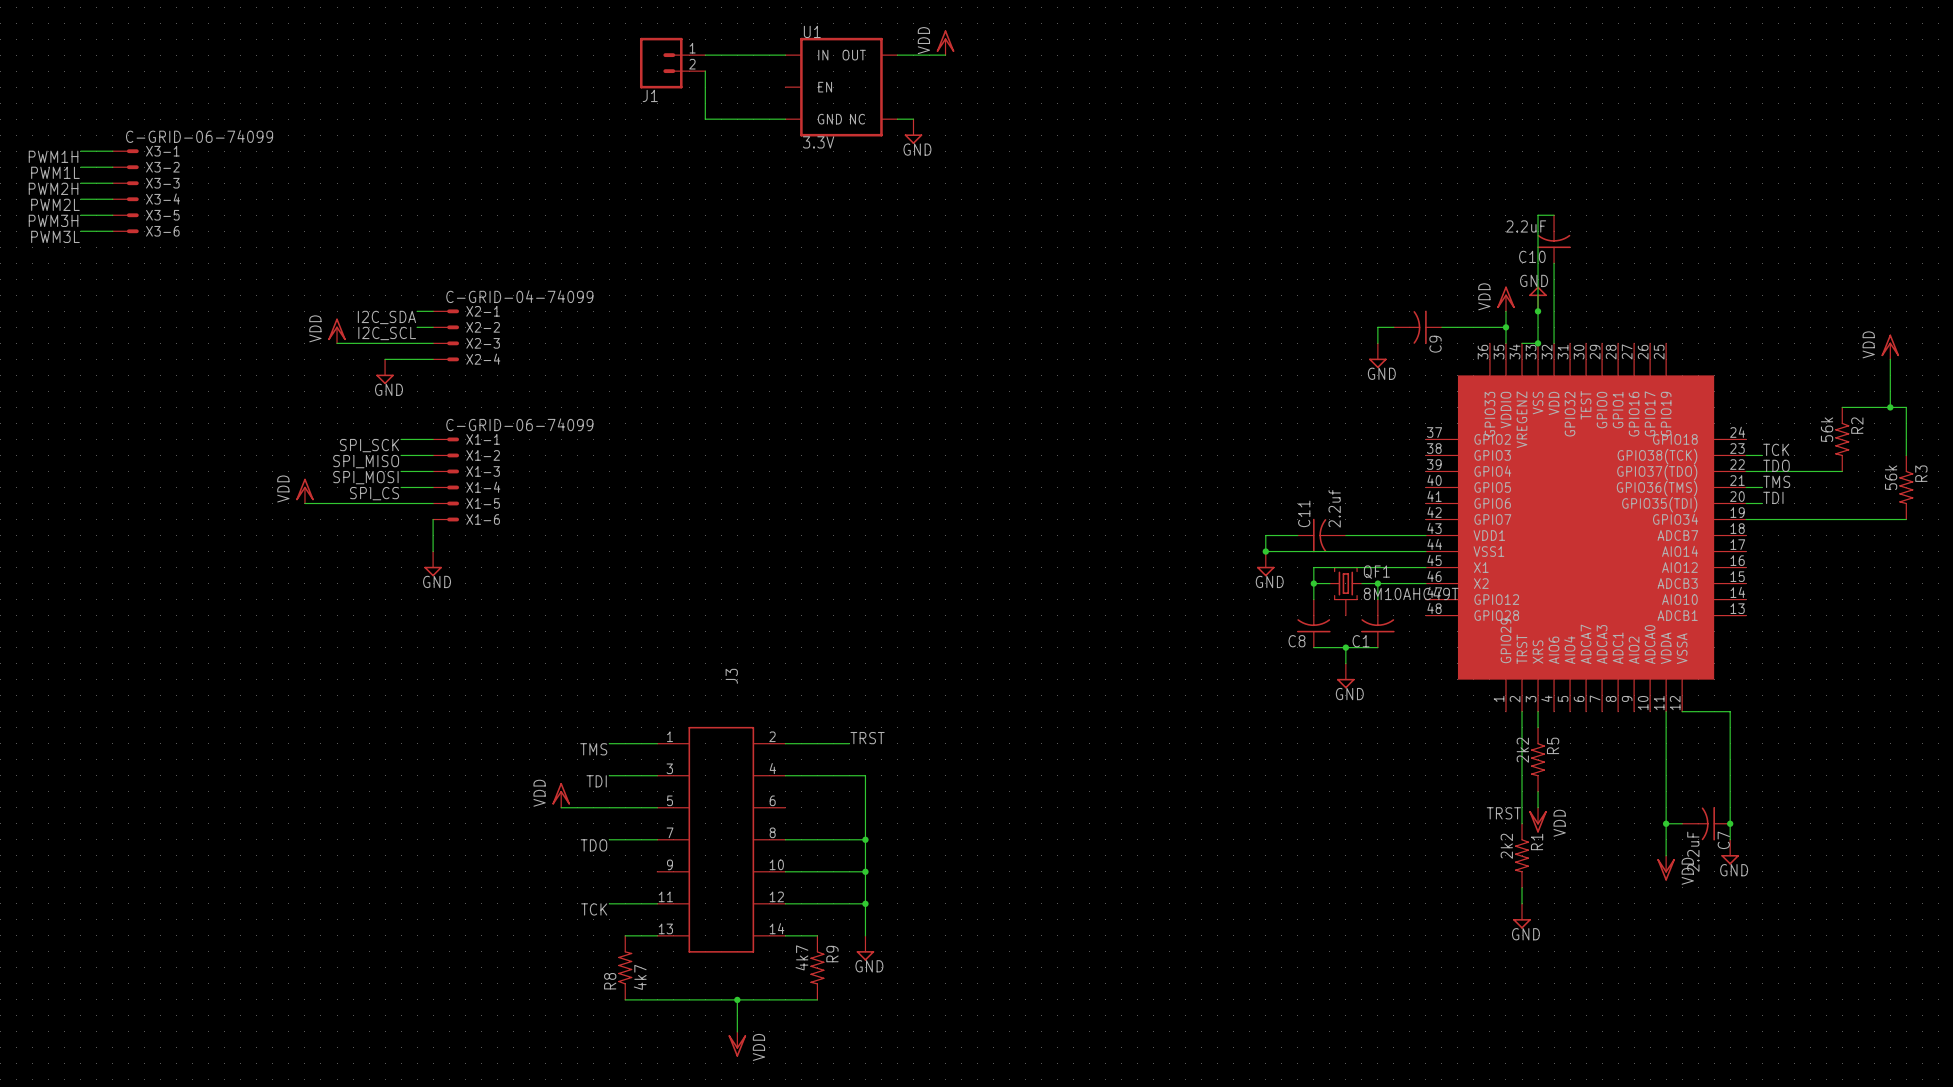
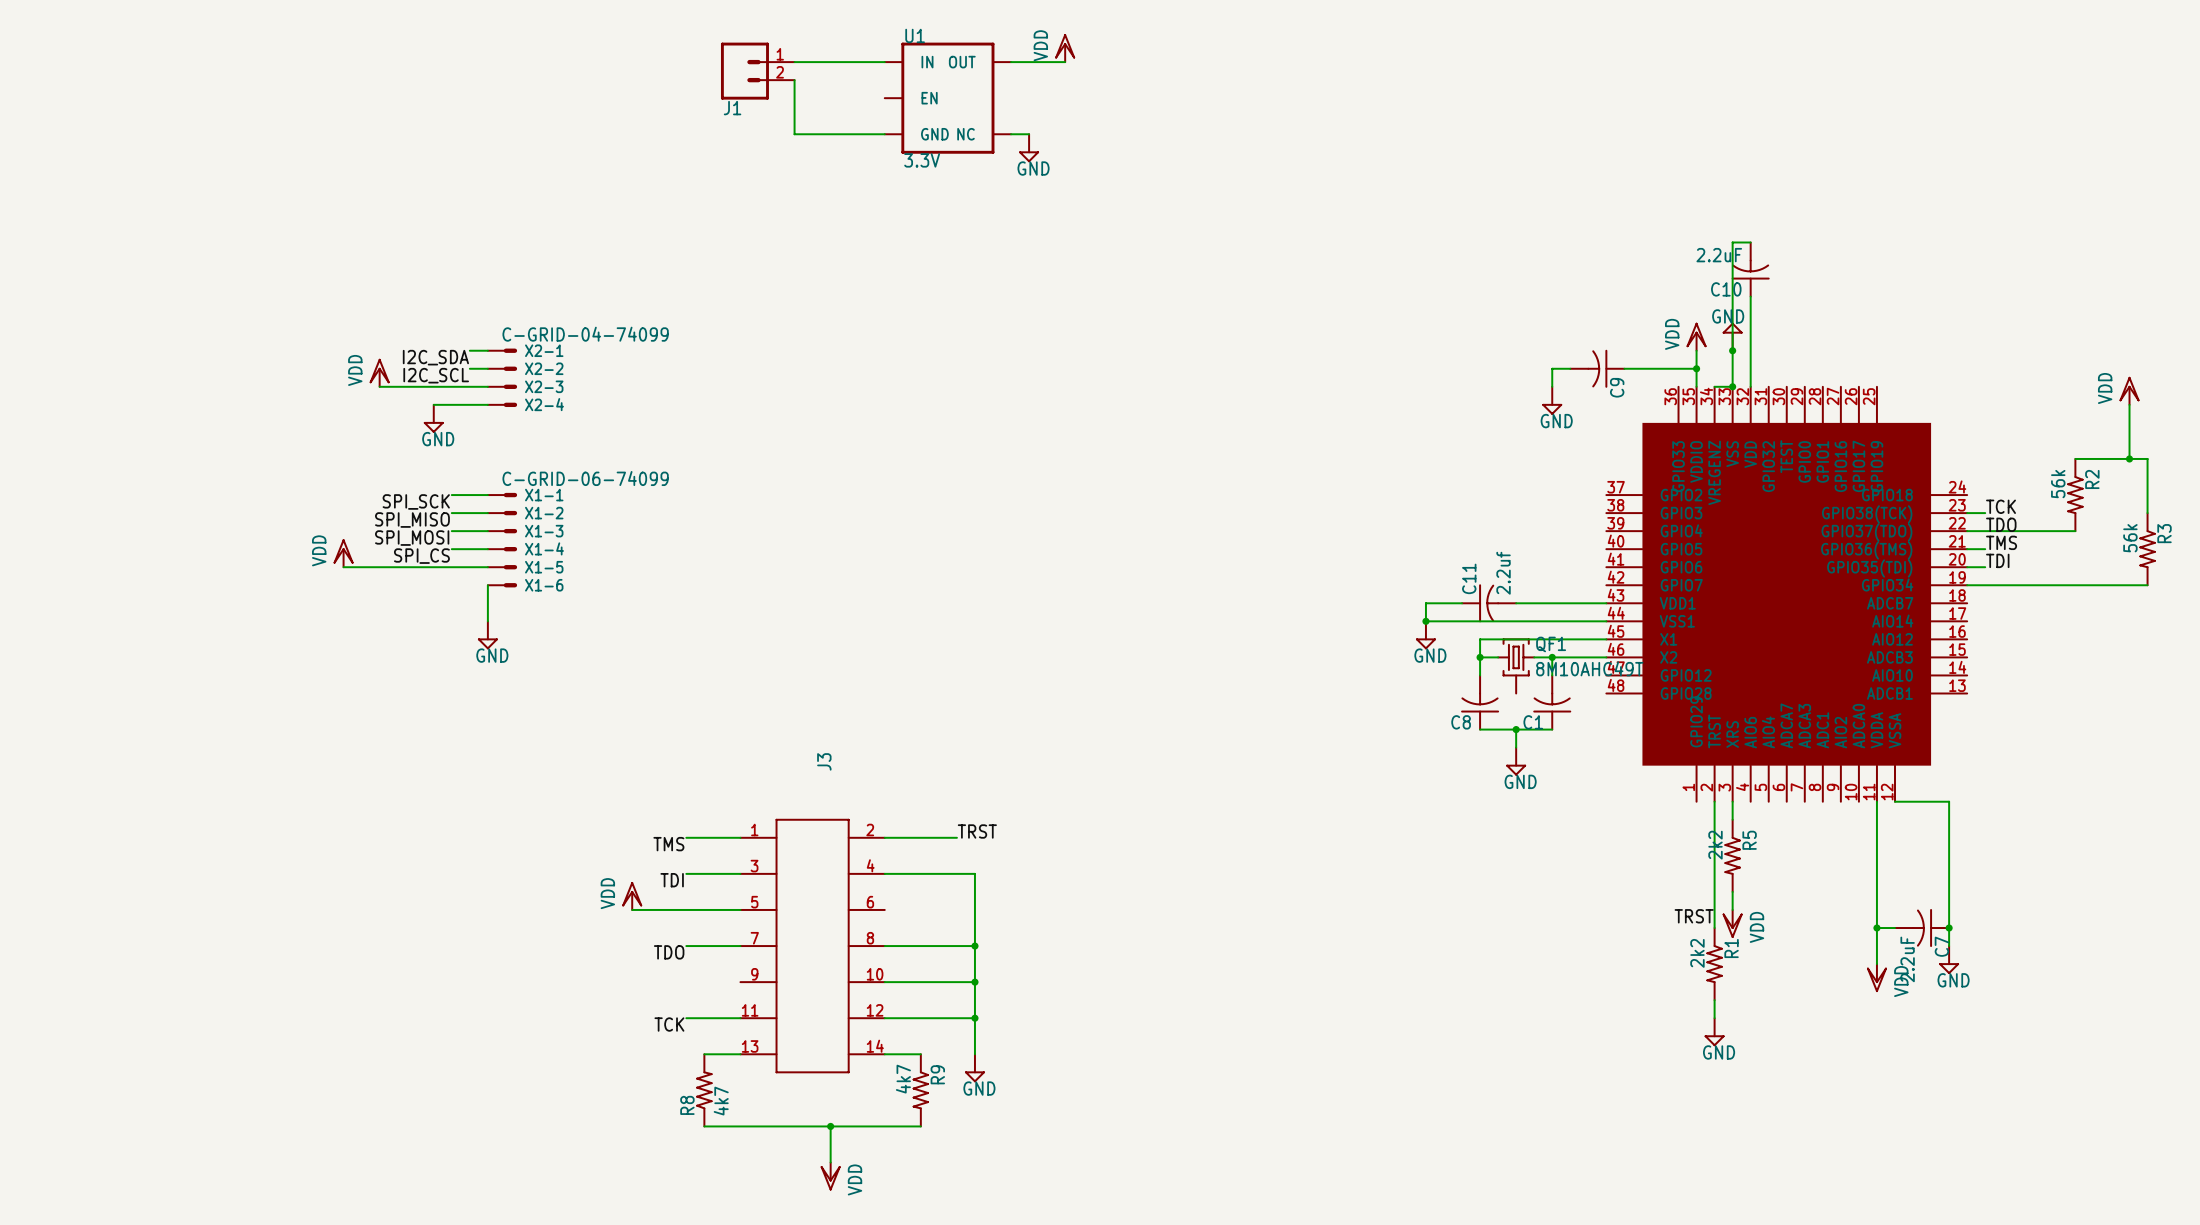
wire: (80, 151) (112, 151) -> none
X3-1: C-GRID-06-74099 (125, 151) -> none
label: PWM1H (53, 156) -> none
wire: (80, 167) (112, 167) -> none
X3-2: (125, 167) -> none
label: PWM1L (55, 172) -> none
wire: (80, 183) (112, 183) -> none
X3-3: (125, 183) -> none
label: PWM2H (53, 188) -> none
wire: (80, 199) (112, 199) -> none
X3-4: (125, 199) -> none
label: PWM2L (55, 204) -> none
wire: (80, 215) (112, 215) -> none
X3-5: (125, 215) -> none
label: PWM3H (53, 220) -> none
wire: (80, 231) (112, 231) -> none
X3-6: (125, 231) -> none
label: PWM3L (55, 236) -> none

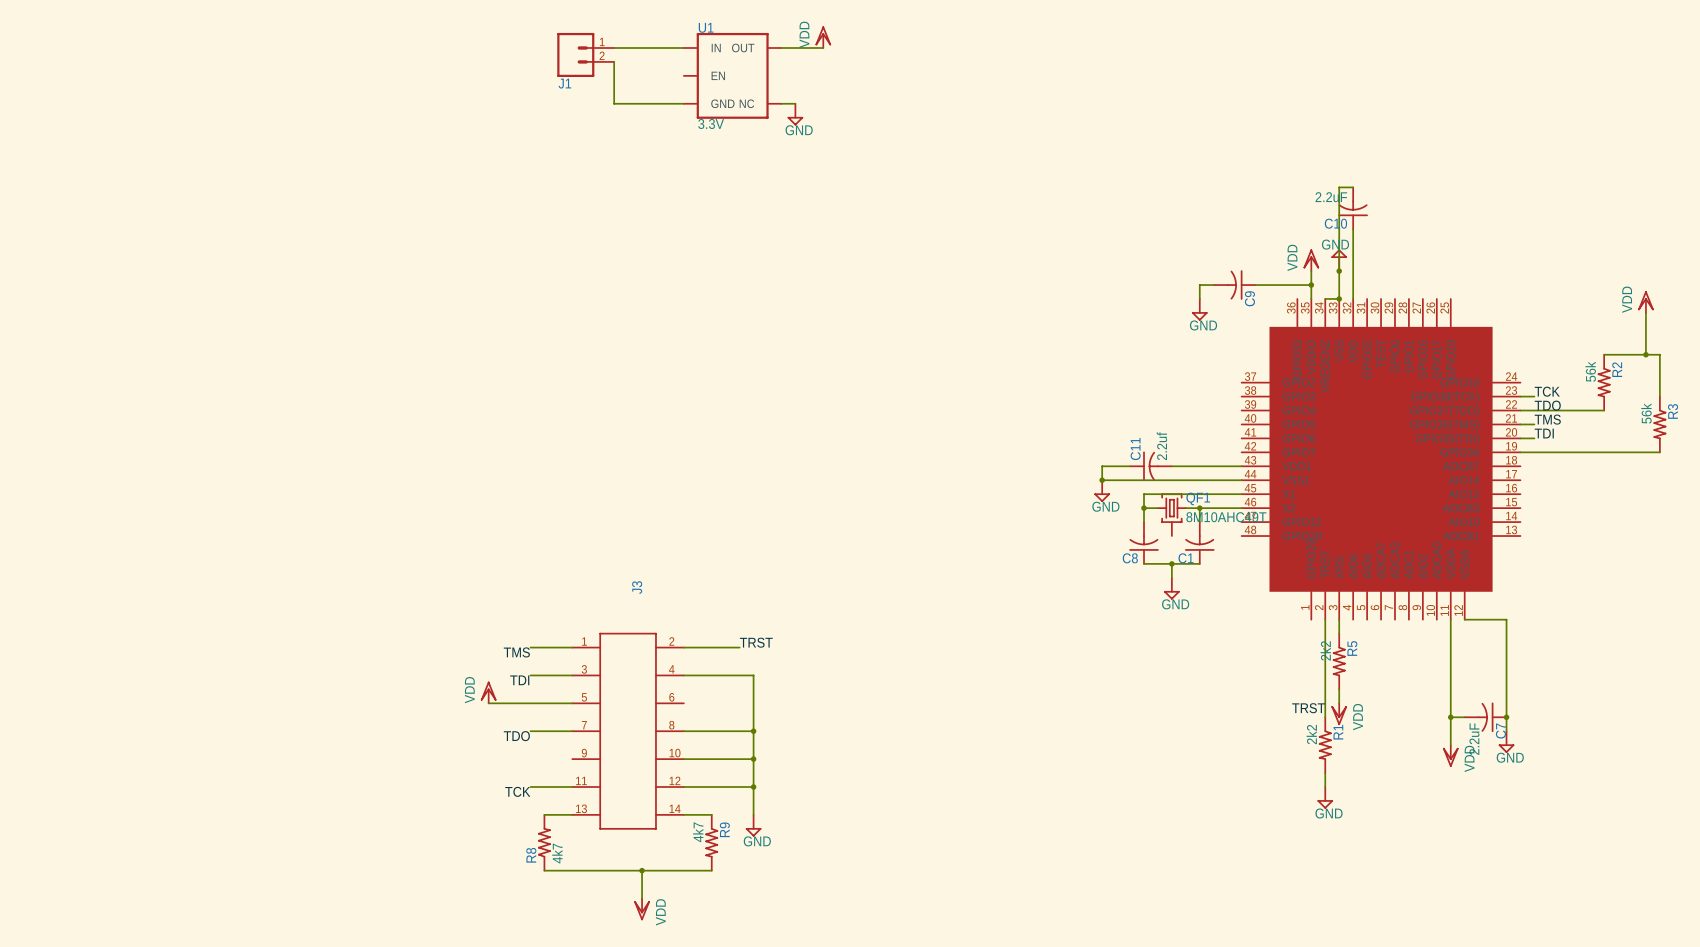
wire: (469, 350) (487, 350) -> none
X2-1: C-GRID-04-74099 (502, 350) -> none
label: I2C_SDA (435, 357) -> none
wire: (469, 368) (487, 368) -> none
X2-2: (502, 368) -> none
power symbol: VDD (379, 372) -> none
label: I2C_SCL (436, 375) -> none
wire: (379, 386) (487, 386) -> none
X2-3: (502, 386) -> none
wire: (433, 404) (487, 404) -> none
X2-4: (502, 404) -> none
power symbol: GND (433, 418) -> none
wire: (451, 495) (487, 495) -> none
X1-1: C-GRID-06-74099 (502, 495) -> none
label: SPI_SCK (416, 501) -> none
wire: (451, 513) (487, 513) -> none
X1-2: (502, 513) -> none
label: SPI_MISO (412, 520) -> none
wire: (451, 531) (487, 531) -> none
X1-3: (502, 531) -> none
label: SPI_MOSI (412, 538) -> none
wire: (451, 549) (487, 549) -> none
X1-4: (502, 549) -> none
power symbol: VDD (343, 553) -> none
label: SPI_CS (421, 556) -> none
wire: (343, 567) (487, 567) -> none
X1-5: (502, 567) -> none
wire: (487, 585) (487, 621) -> none
X1-6: (502, 585) -> none
power symbol: GND (487, 635) -> none

